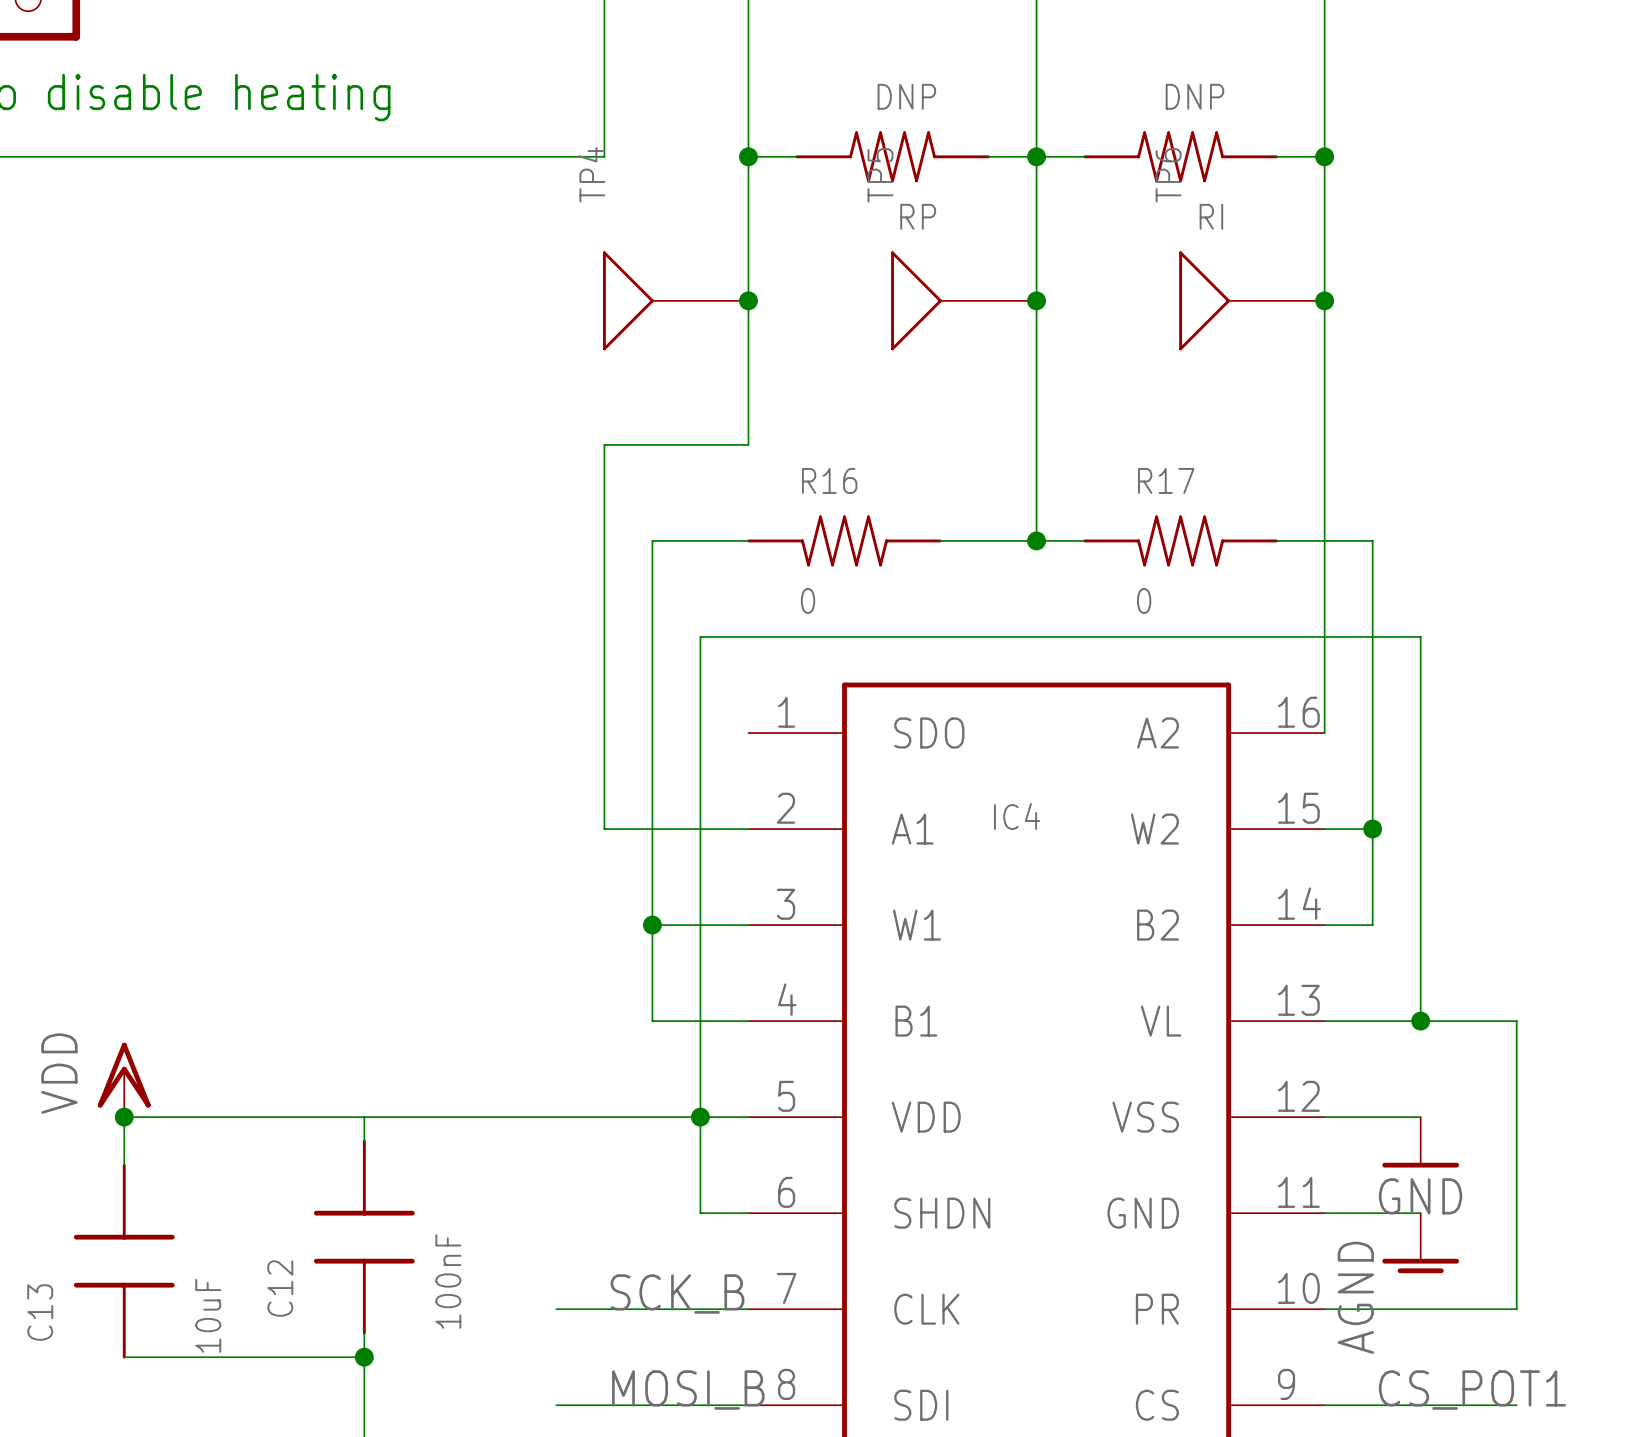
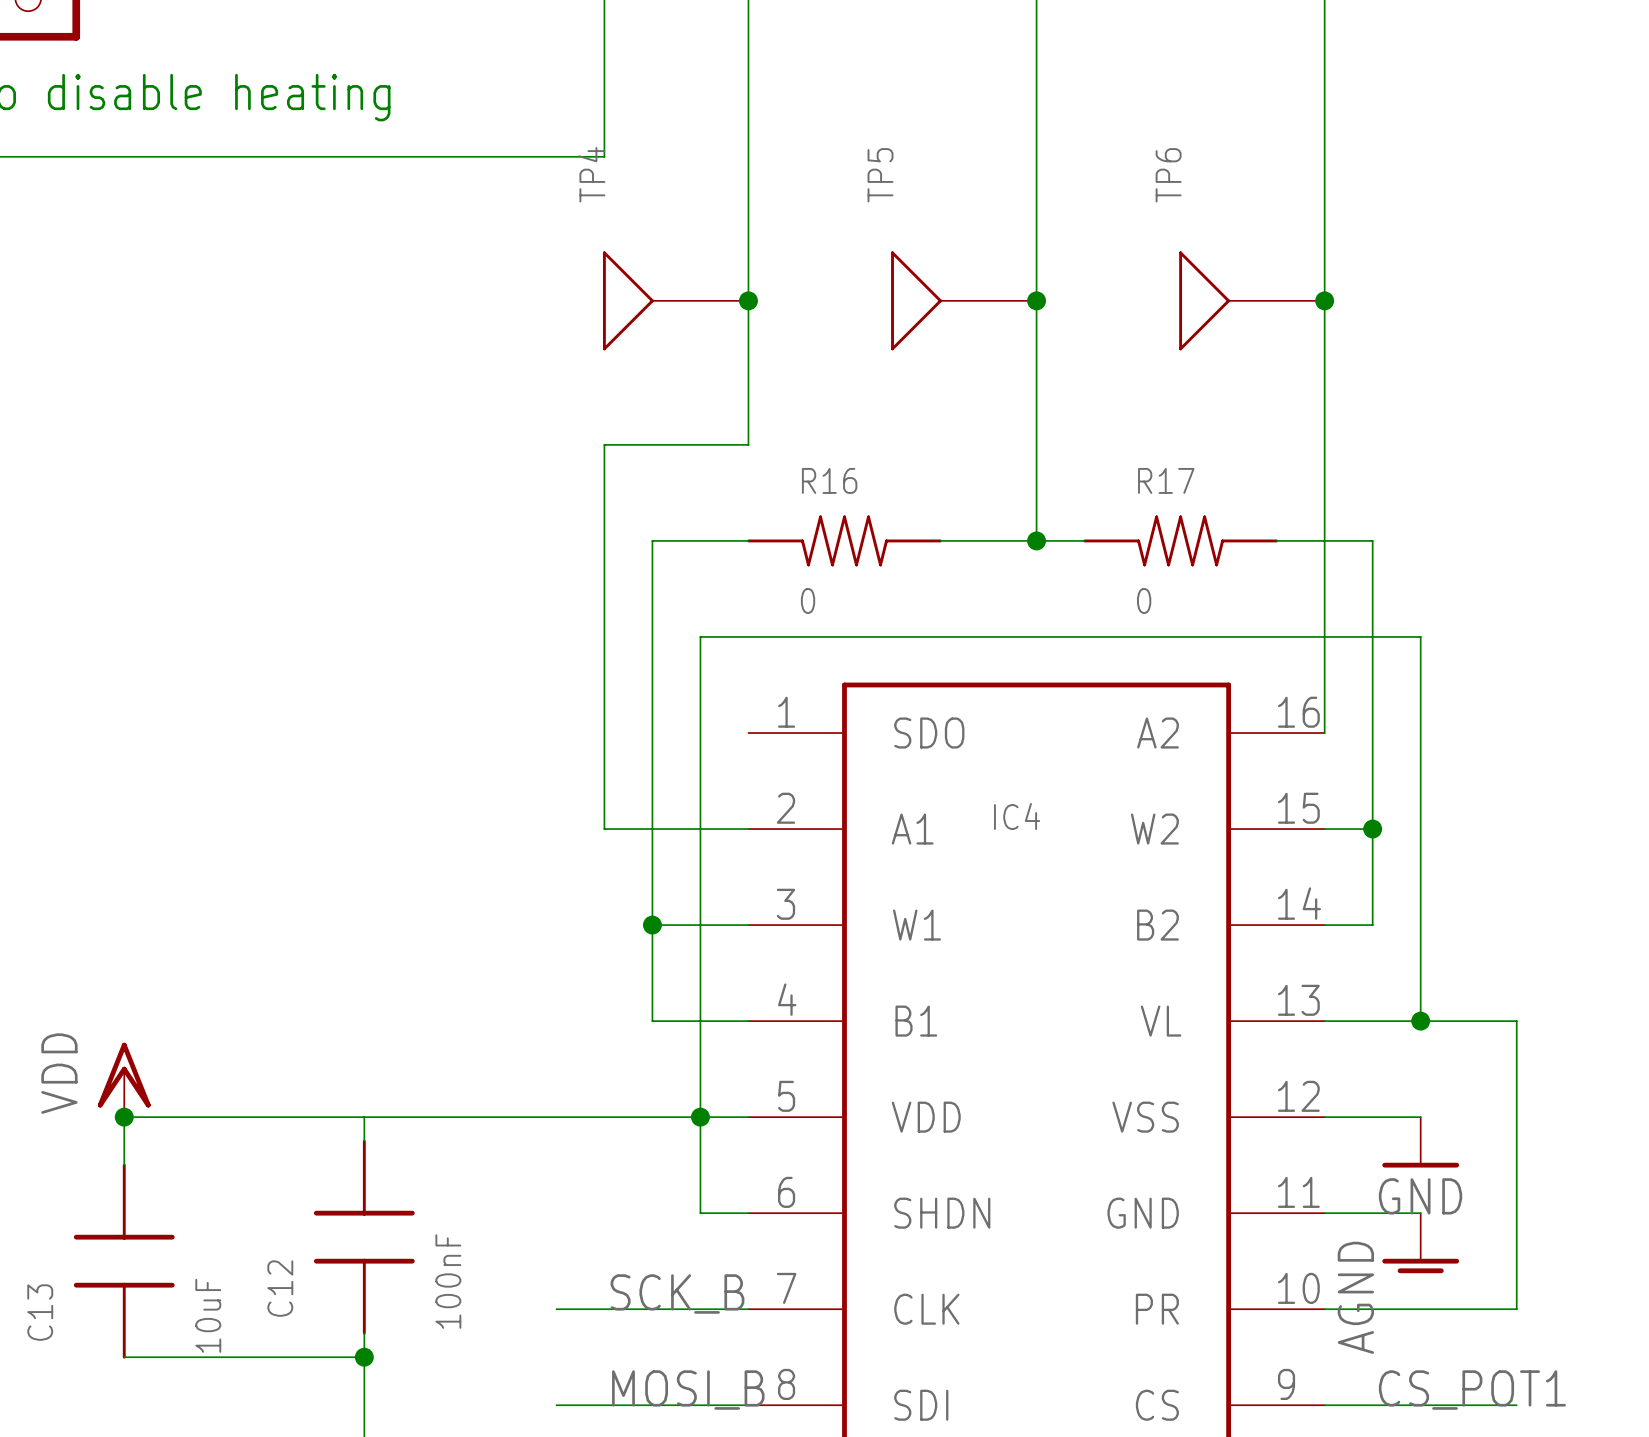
wire: (748, 156) (796, 156) -> none
junction: (748, 156) -> none
RP: DNP (892, 156) -> none
wire: (988, 156) (1084, 156) -> none
junction: (1036, 156) -> none
RI: DNP (1180, 156) -> none
wire: (1276, 156) (1324, 156) -> none
junction: (1324, 156) -> none

